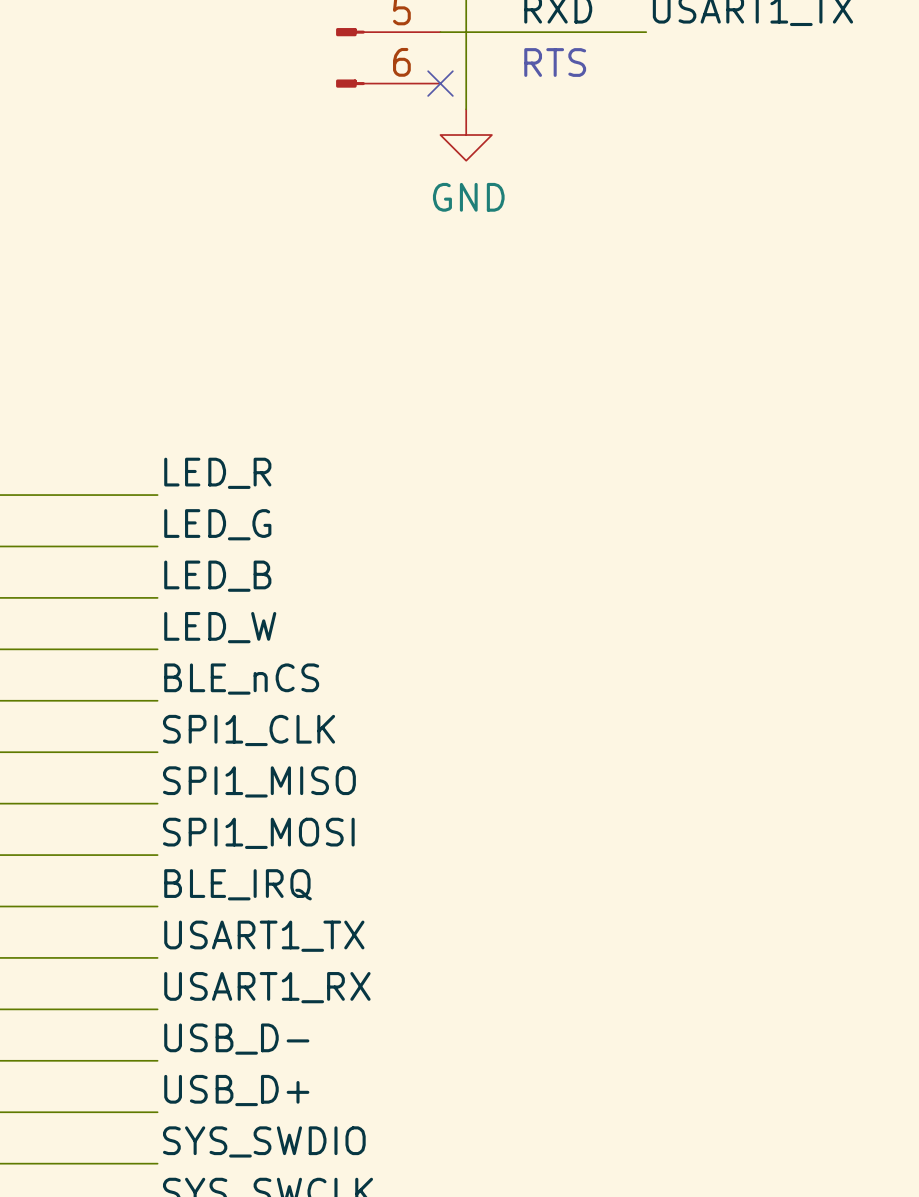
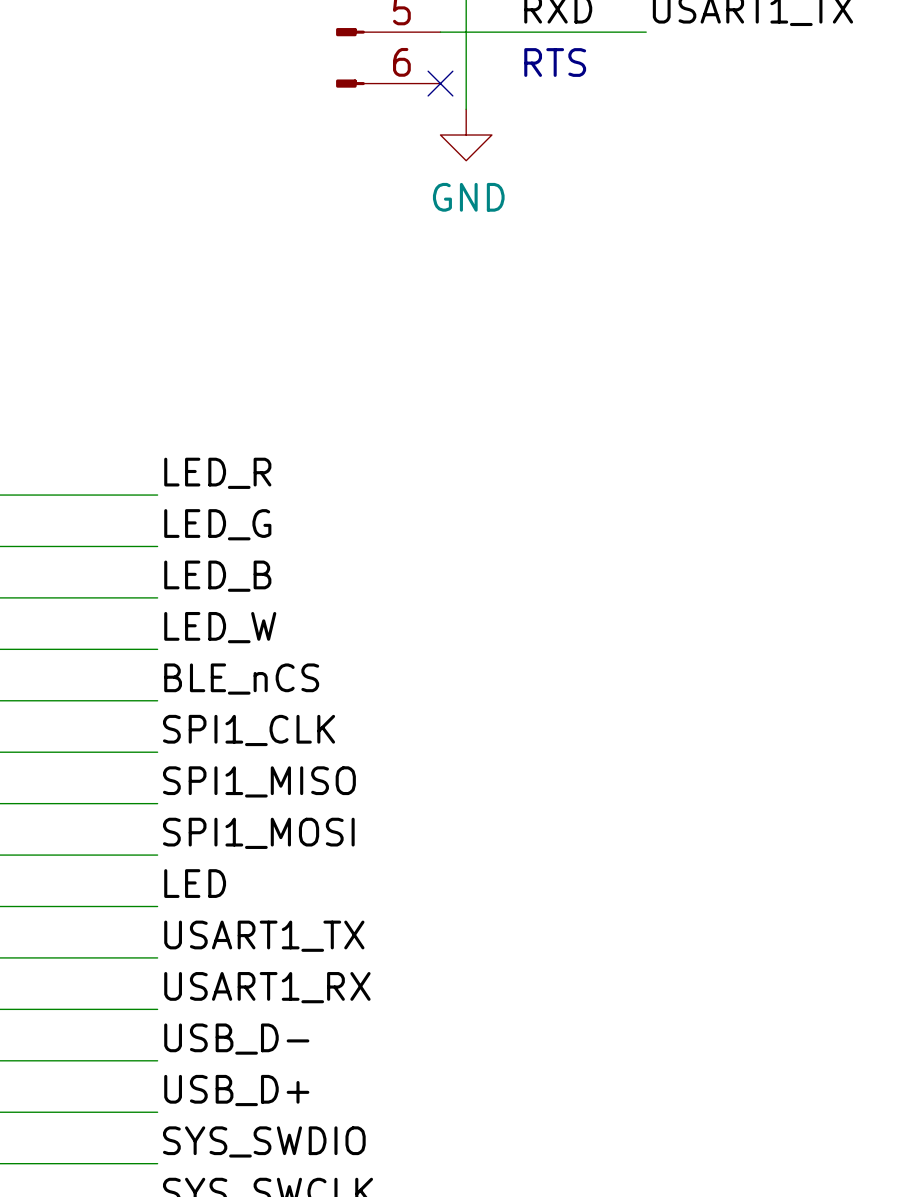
label: BLE_IRQ (238, 884) -> LED (195, 883)

